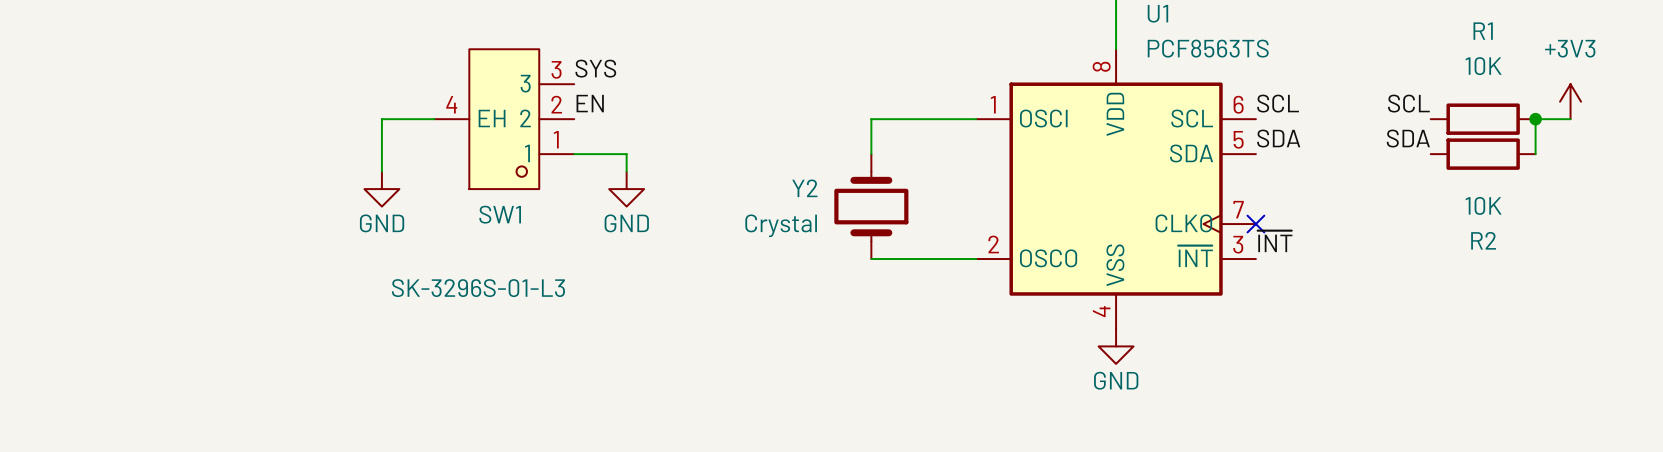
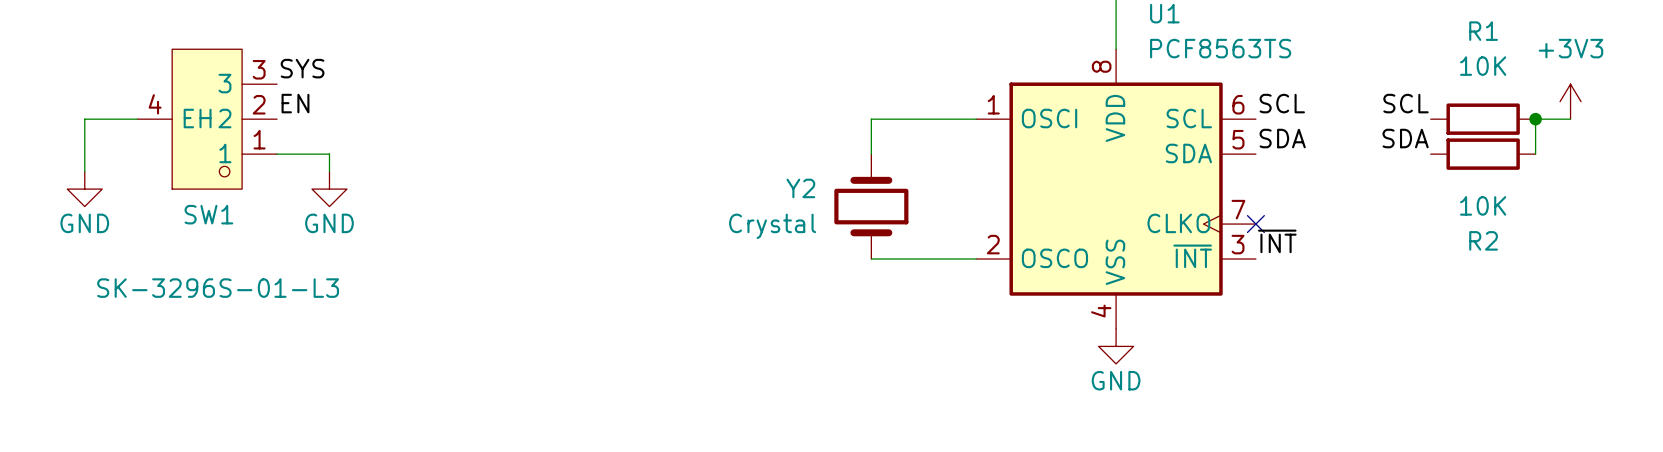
label position: SYS (595, 68) -> SYS (302, 68)
label position: EN (590, 103) -> EN (295, 103)
wire: (434, 119) (381, 119) (381, 171) -> (137, 119) (84, 119) (84, 171)
SW1 position: (504, 119) -> (207, 119)
wire: (574, 154) (626, 154) (626, 171) -> (277, 154) (329, 154) (329, 171)
power symbol: none -> GND (84, 189)
power symbol position: GND (381, 189) -> GND (329, 189)
power symbol: GND (626, 189) -> none

